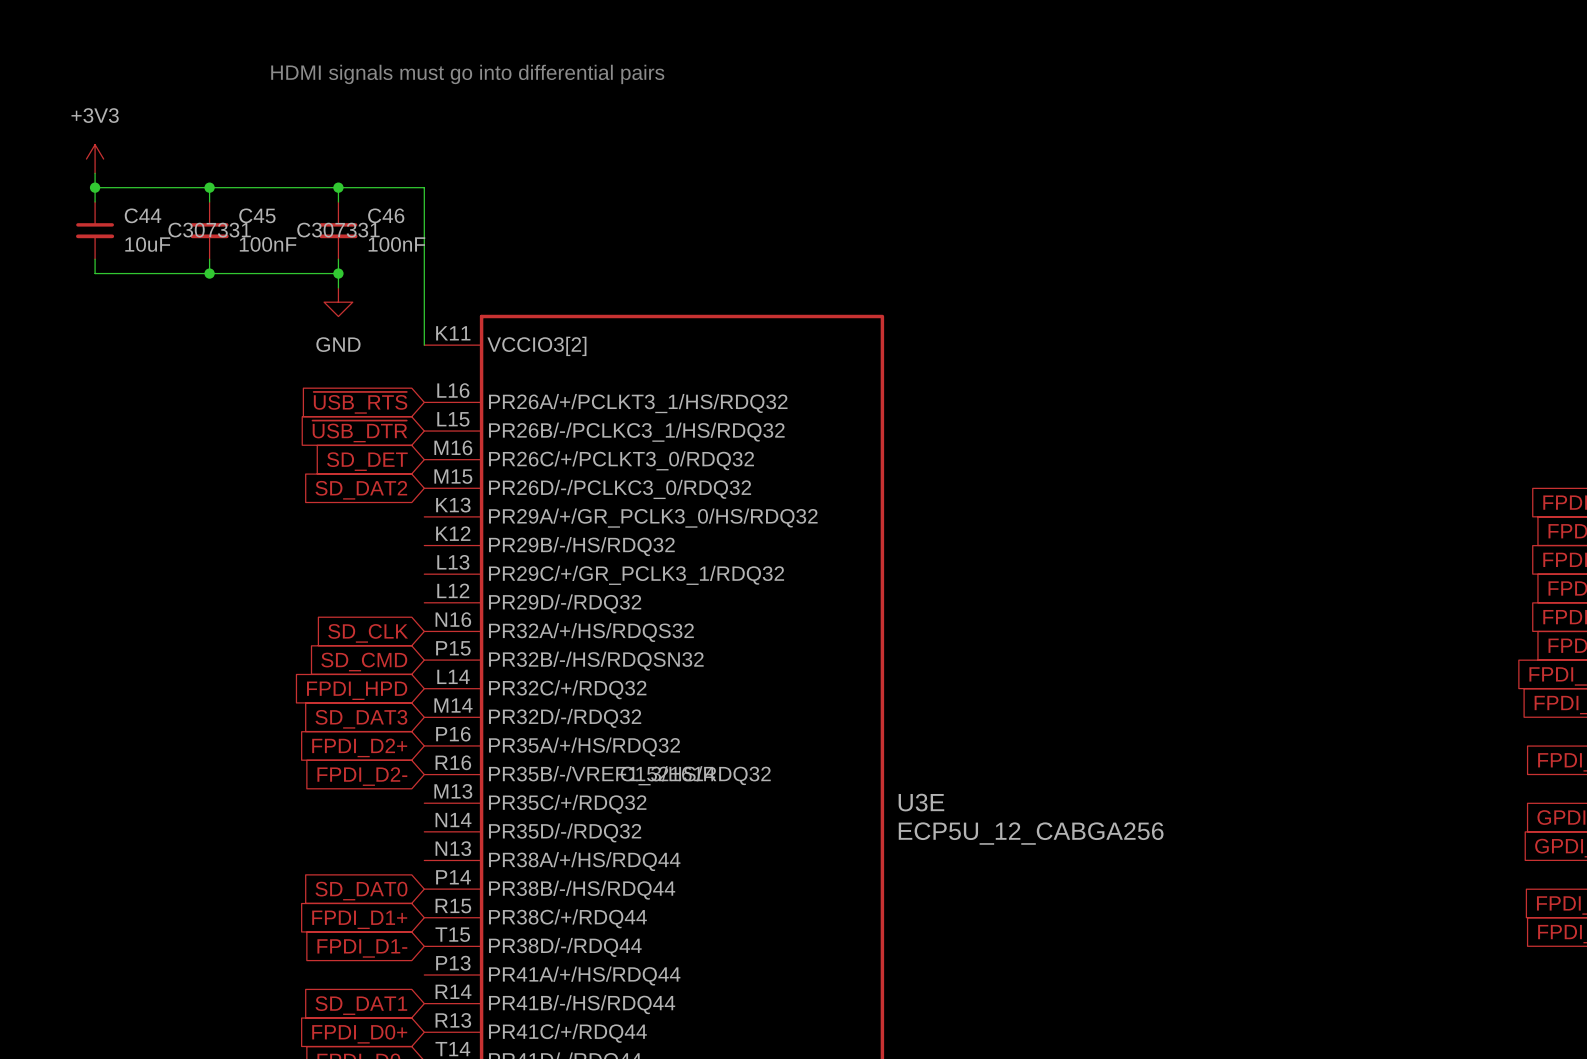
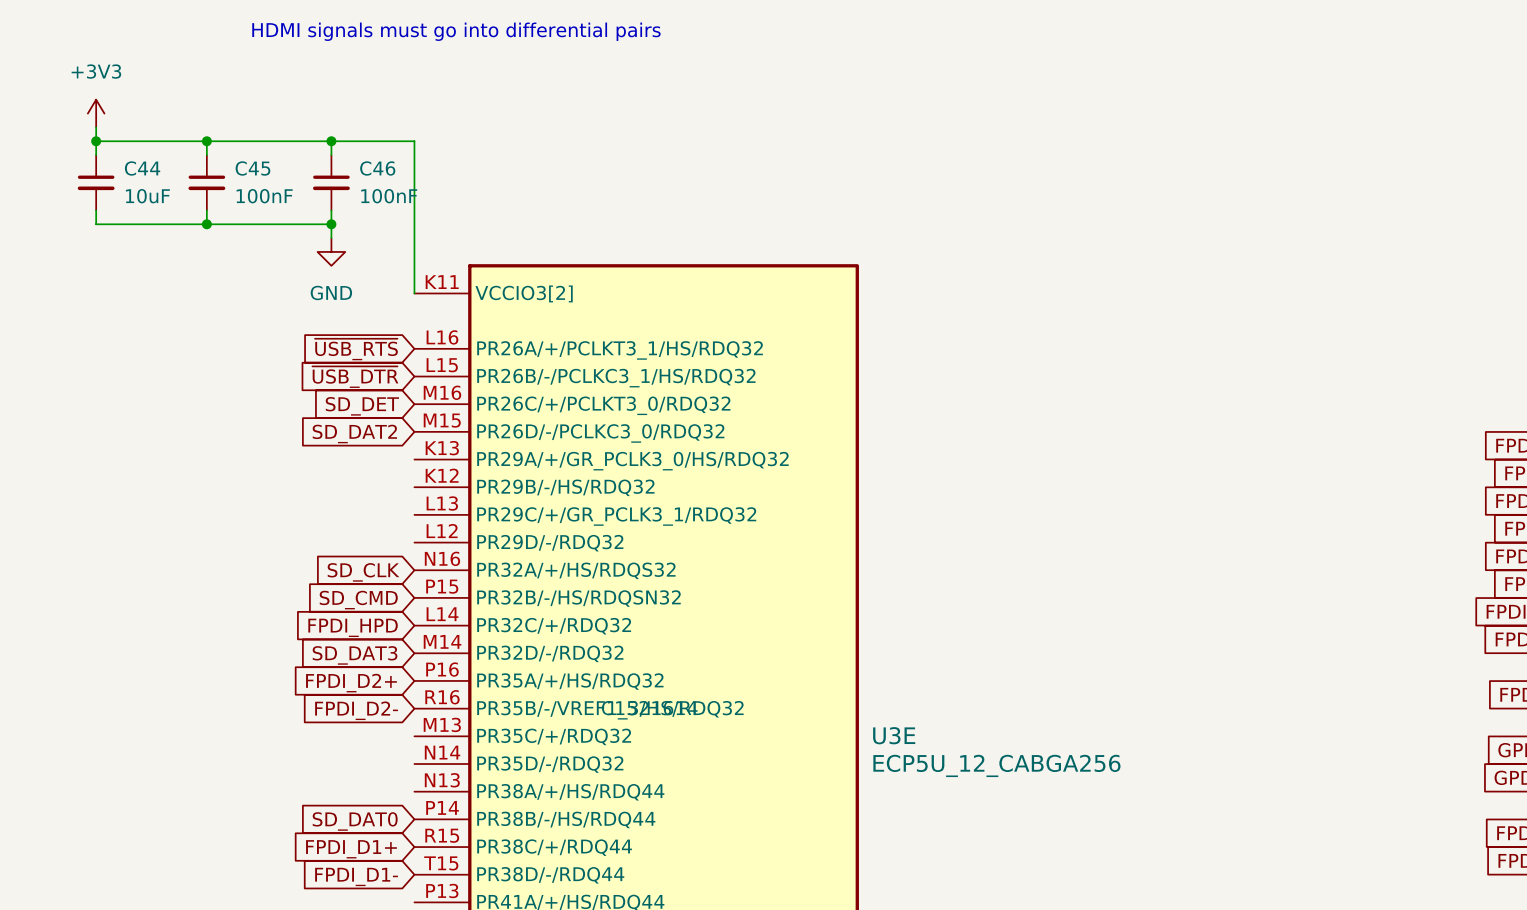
C45 text: C307331 (209, 230) -> none
C46 text: C307331 (338, 230) -> none

